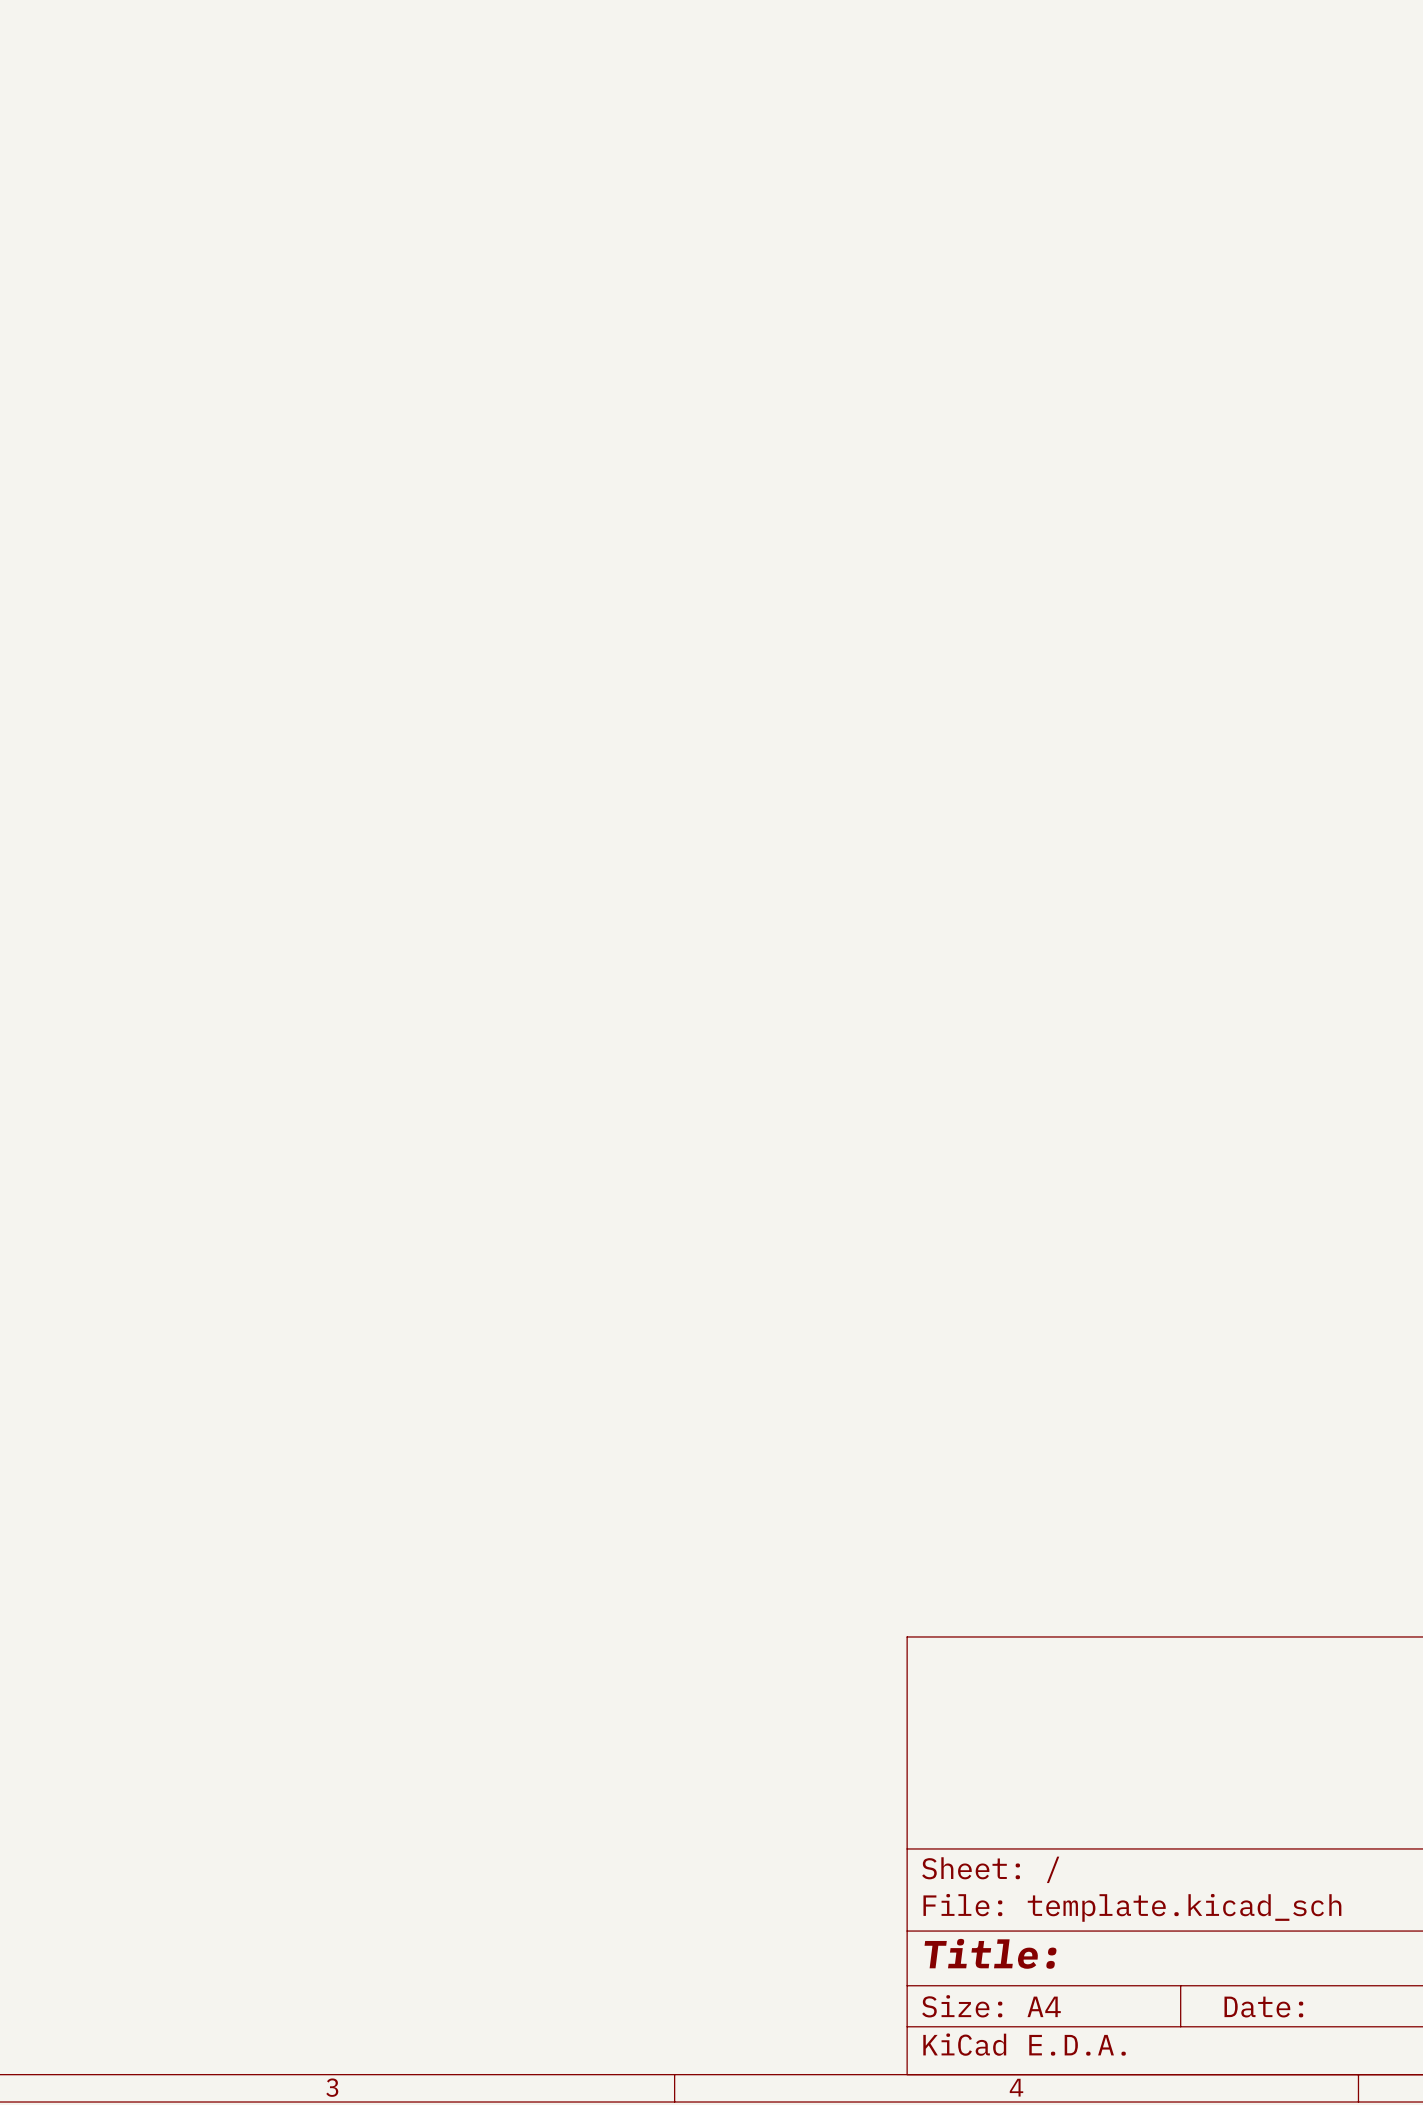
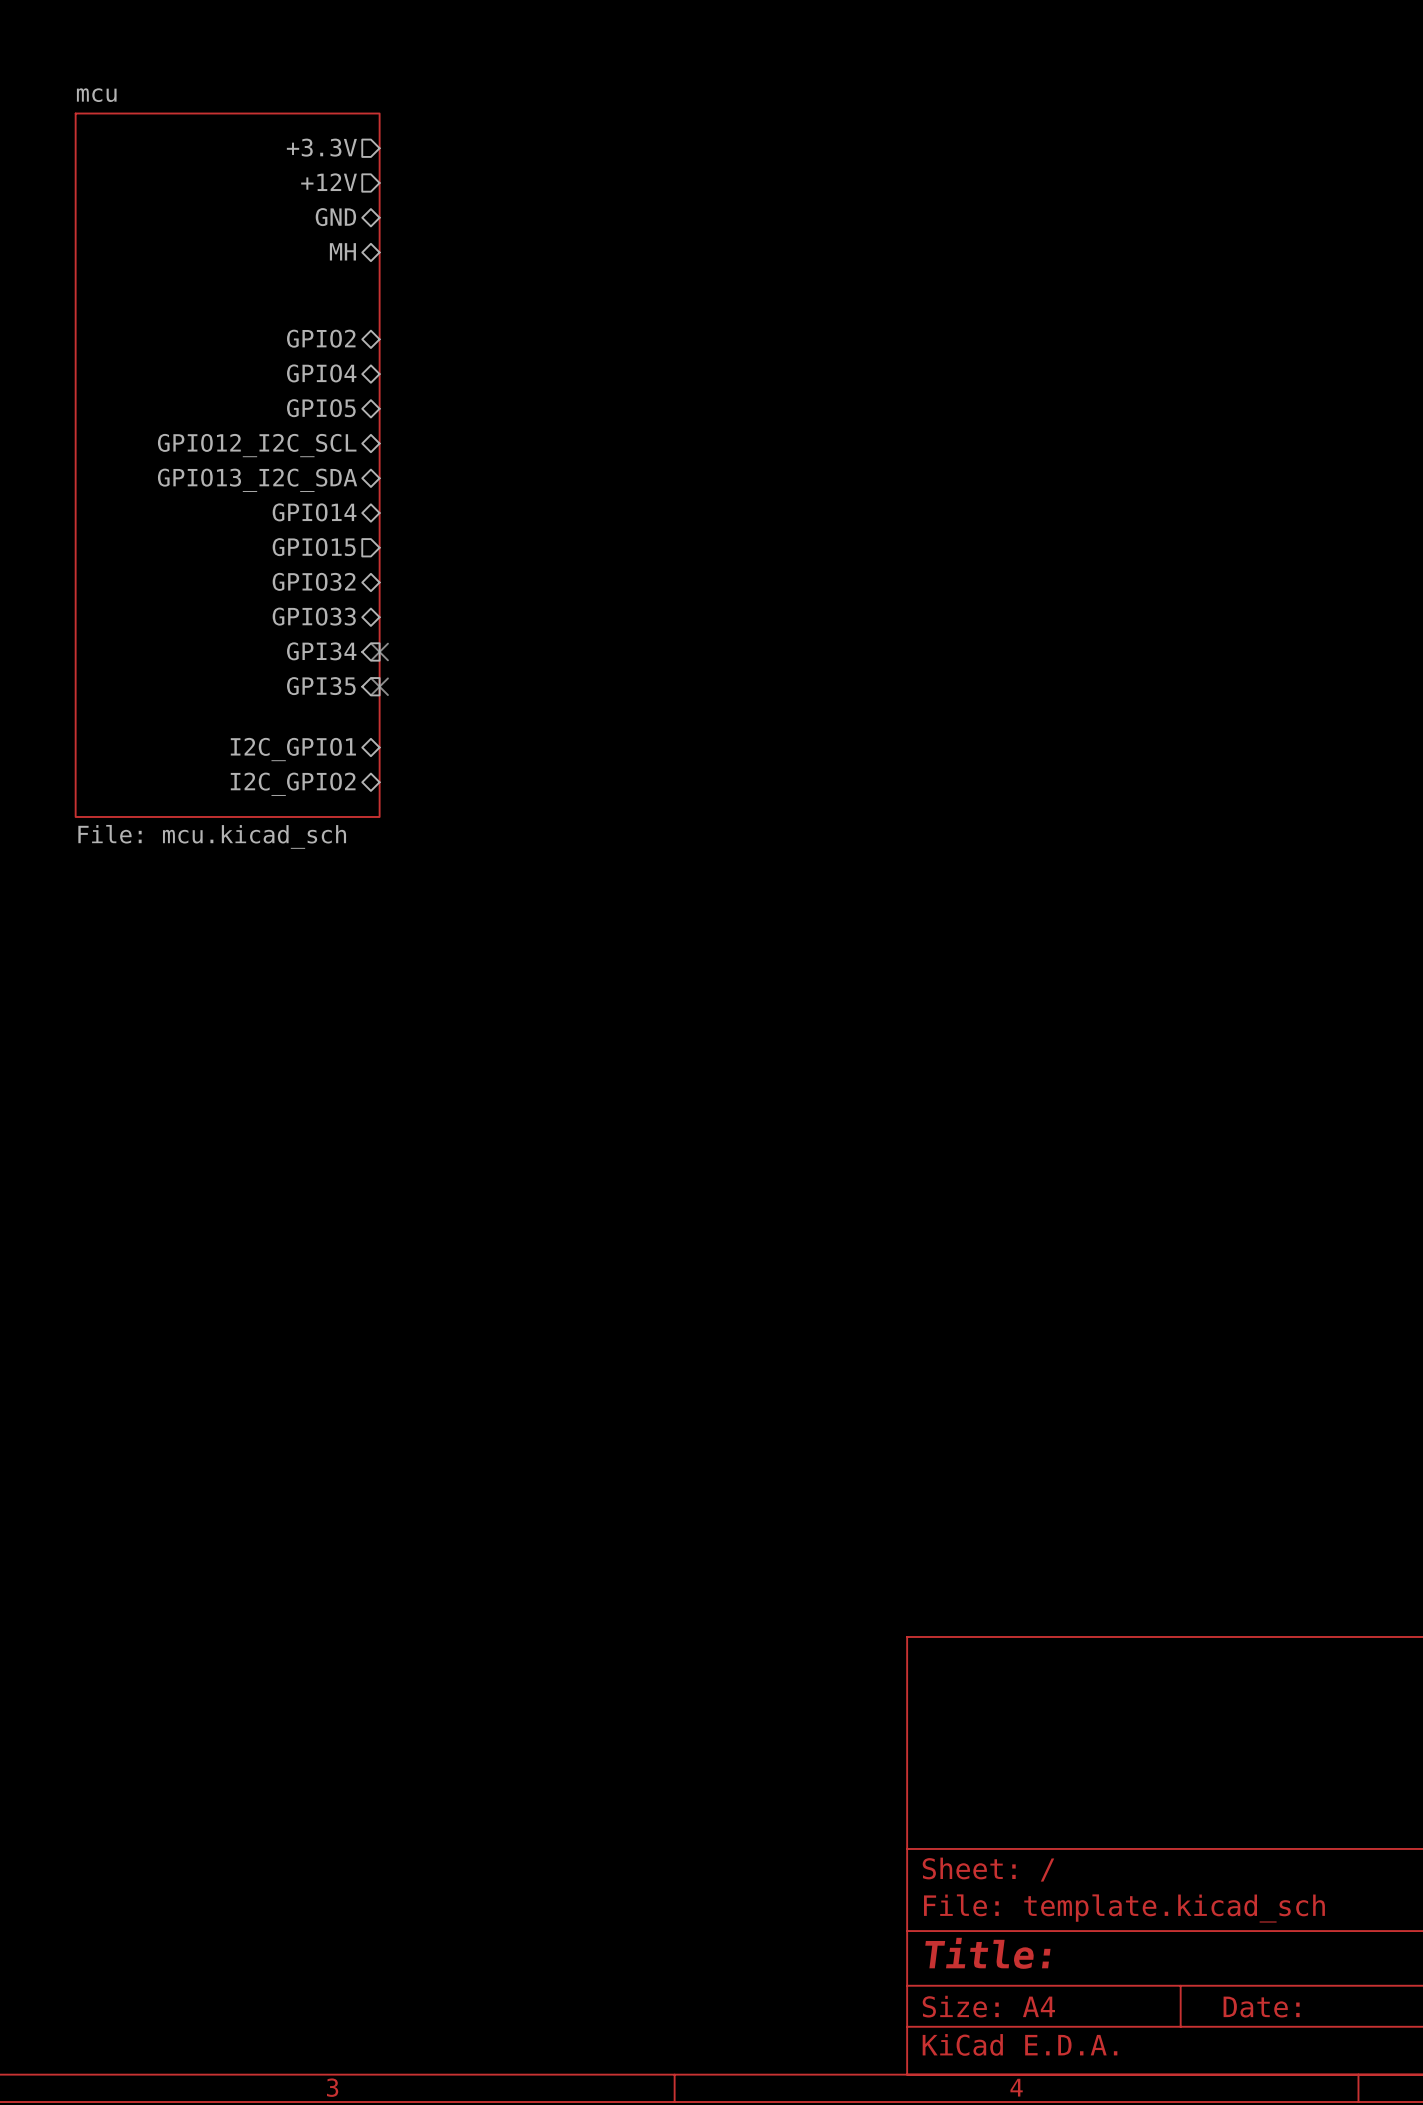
sheet pin: none -> +3.3V (321, 147)
sheet pin: none -> +12V (329, 182)
sheet pin: none -> GND (335, 217)
sheet pin: none -> MH (342, 251)
sheet pin: none -> GPIO2 (321, 338)
sheet pin: none -> GPIO4 (321, 373)
sheet pin: none -> GPIO5 (321, 408)
sheet pin: none -> GPIO12_I2C_SCL (257, 445)
sheet mcu: none -> File: mcu.kicad_sch (227, 465)
sheet pin: none -> GPIO13_I2C_SDA (257, 480)
sheet pin: none -> GPIO14 (314, 512)
sheet pin: none -> GPIO15 (314, 547)
sheet pin: none -> GPIO32 (314, 581)
sheet pin: none -> GPIO33 (314, 616)
sheet pin: none -> GPI34 (321, 651)
no-connect mark: none -> (379, 651)
sheet pin: none -> GPI35 (321, 686)
no-connect mark: none -> (379, 686)
sheet pin: none -> I2C_GPIO1 (293, 749)
sheet pin: none -> I2C_GPIO2 (293, 784)

